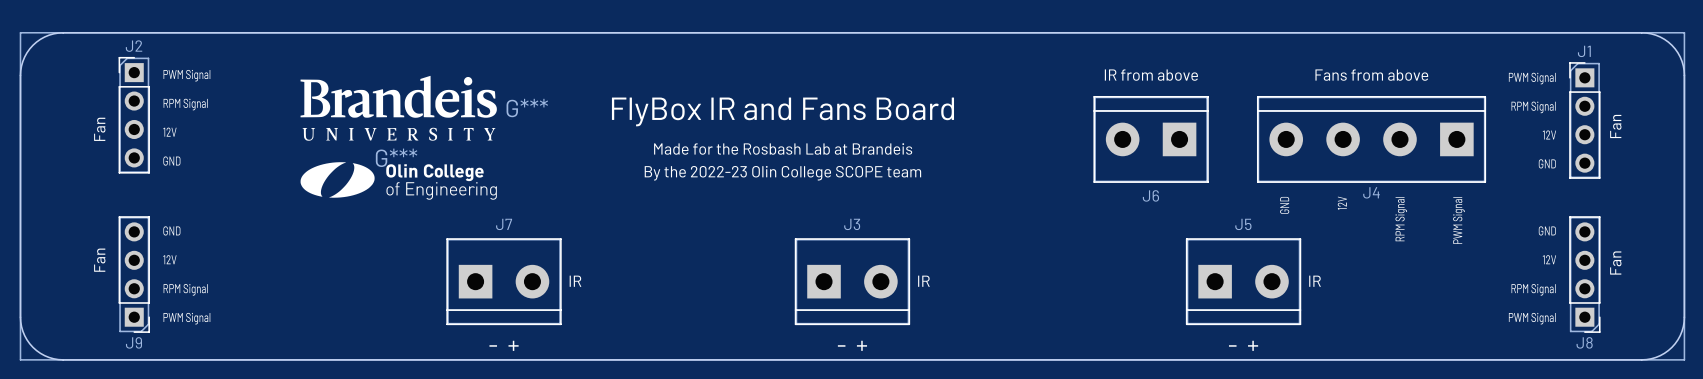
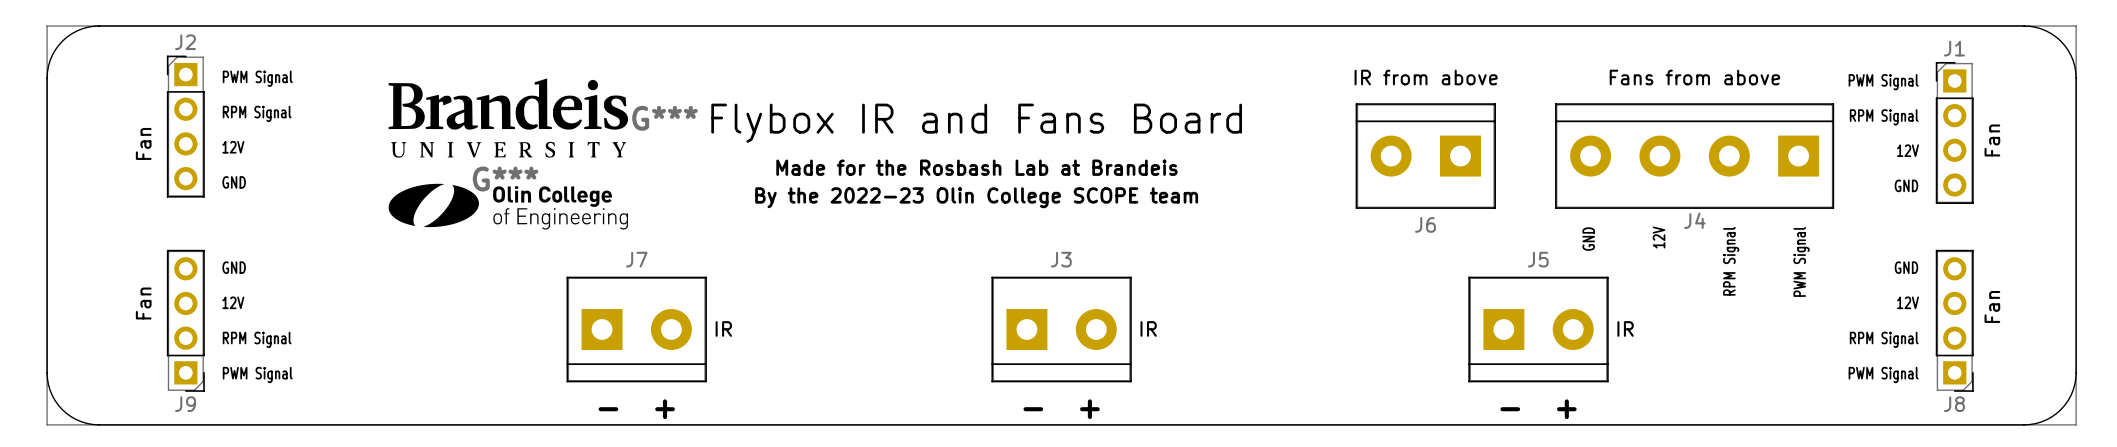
text: FlyBox IR and Fans Board (782, 111) -> Flybox IR and Fans Board (976, 123)

